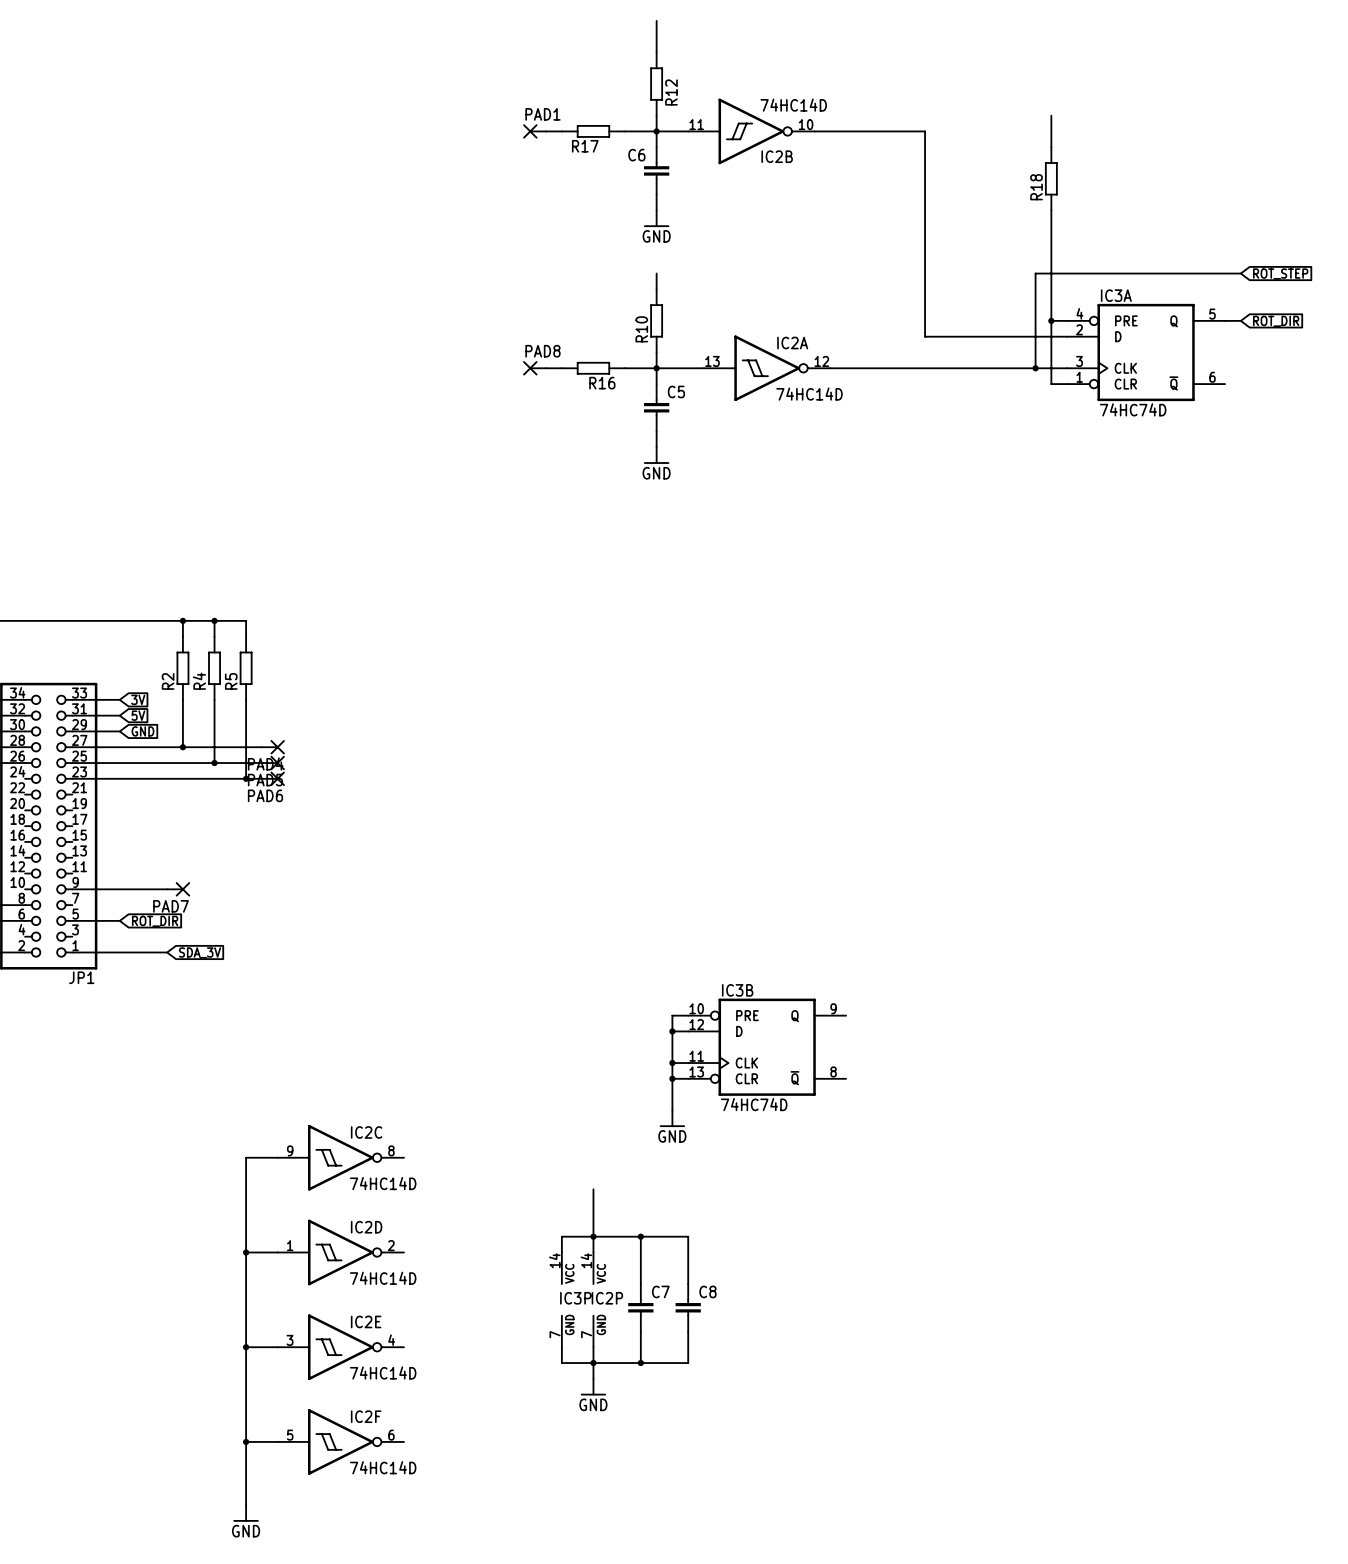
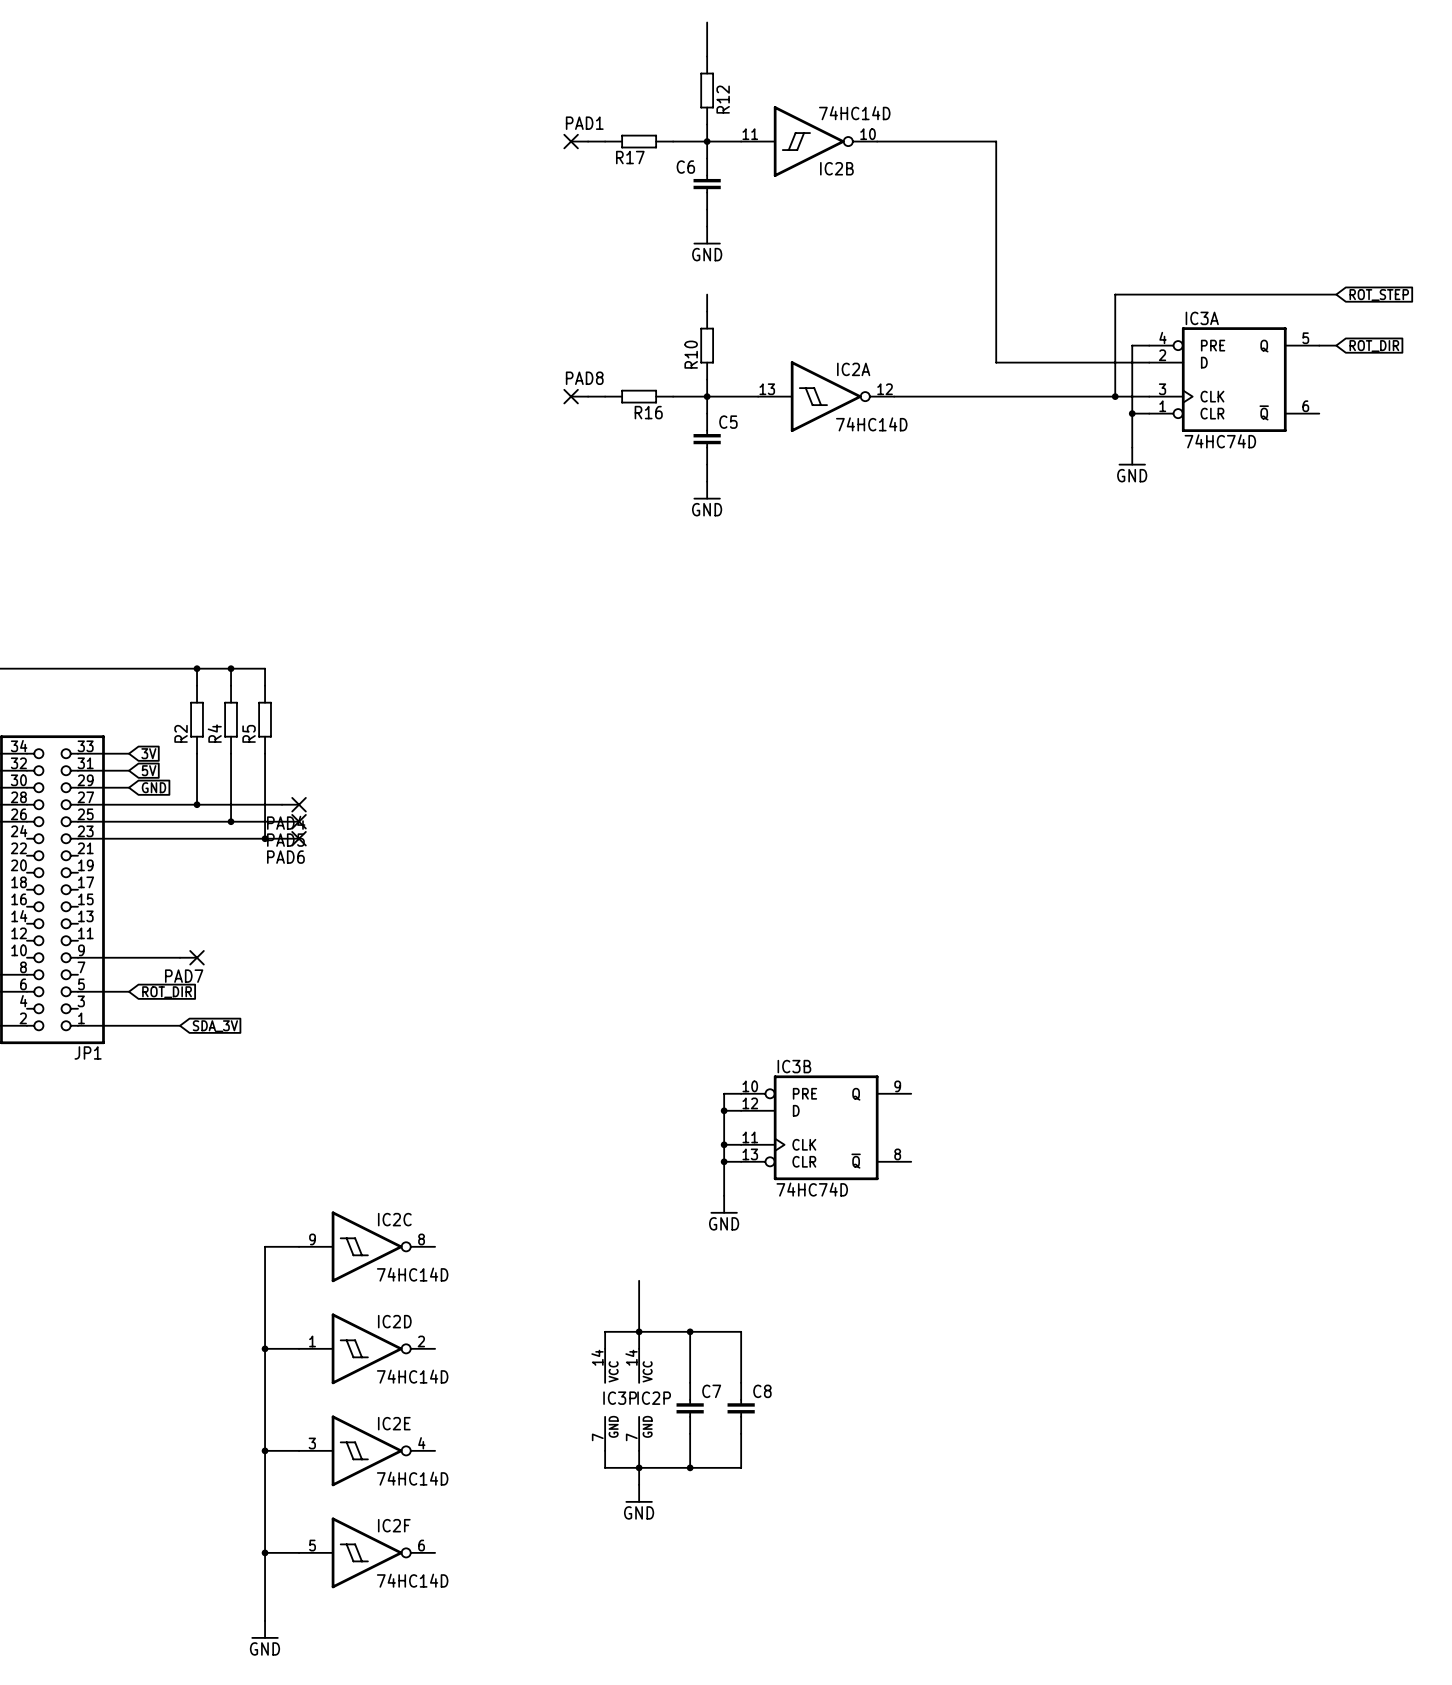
wire: (1051, 115) (1051, 147) -> none
R18: (1051, 178) -> none
wire: (1051, 210) (1051, 320) -> none
junction: (1051, 320) -> none
wire: none -> (1132, 413) (1132, 447)
junction: none -> (1132, 413)
power symbol: none -> GND (1132, 456)

